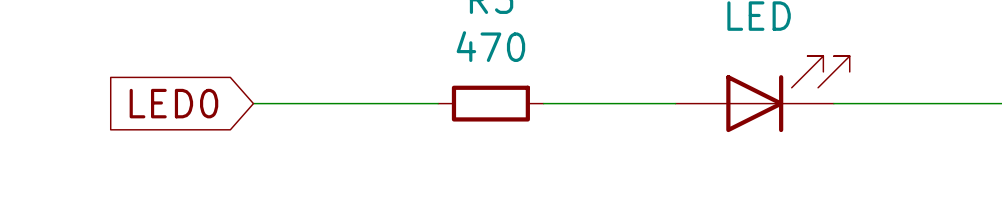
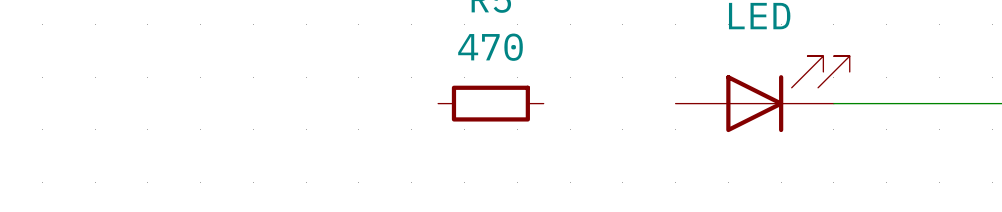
global label: LED0 (173, 103) -> none
wire: (253, 103) (438, 103) -> none
wire: (543, 103) (675, 103) -> none

